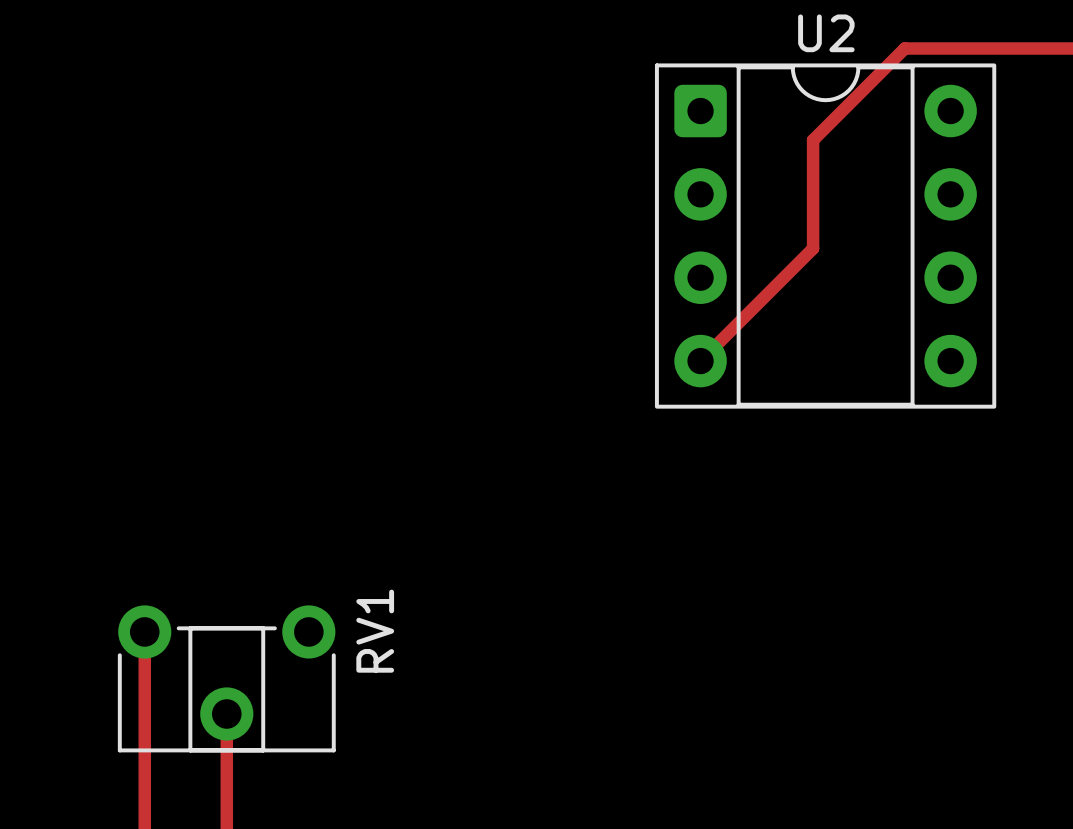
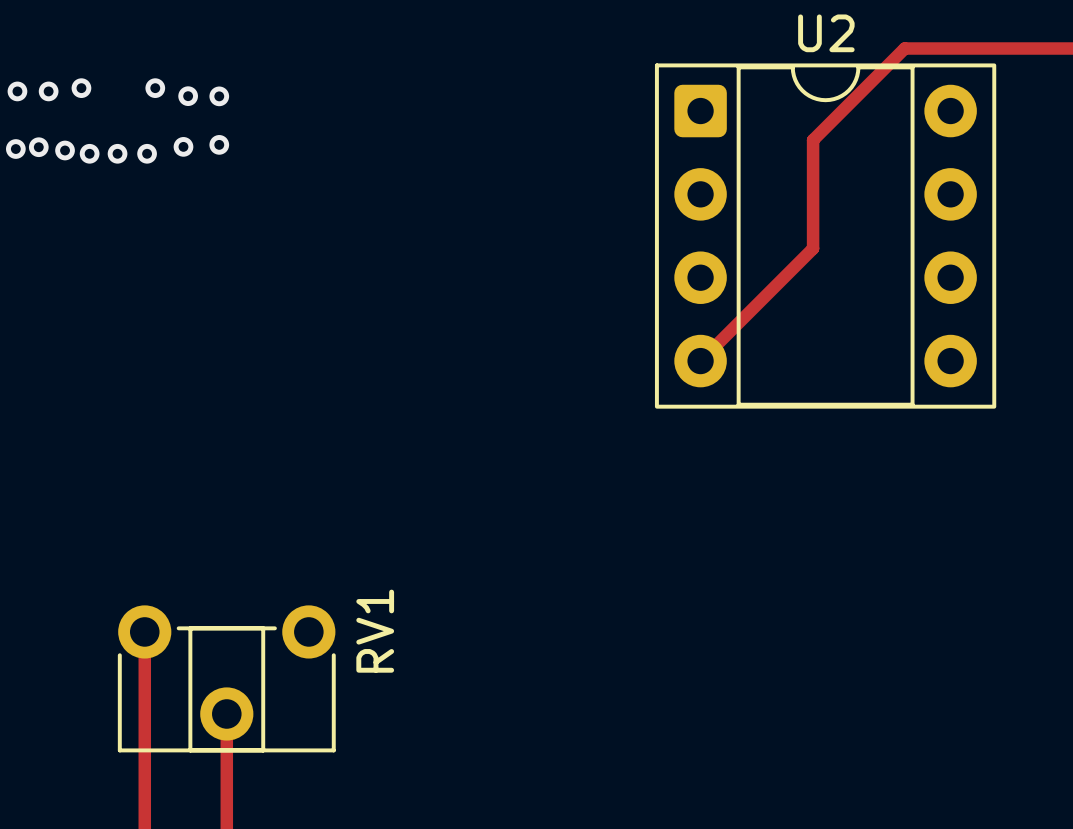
via: none -> (81, 88)
via: none -> (155, 88)
via: none -> (17, 91)
via: none -> (48, 91)
via: none -> (188, 96)
via: none -> (219, 96)
via: none -> (219, 144)
via: none -> (183, 146)
via: none -> (38, 147)
via: none -> (15, 149)
via: none -> (65, 150)
via: none -> (89, 153)
via: none -> (117, 153)
via: none -> (147, 153)

